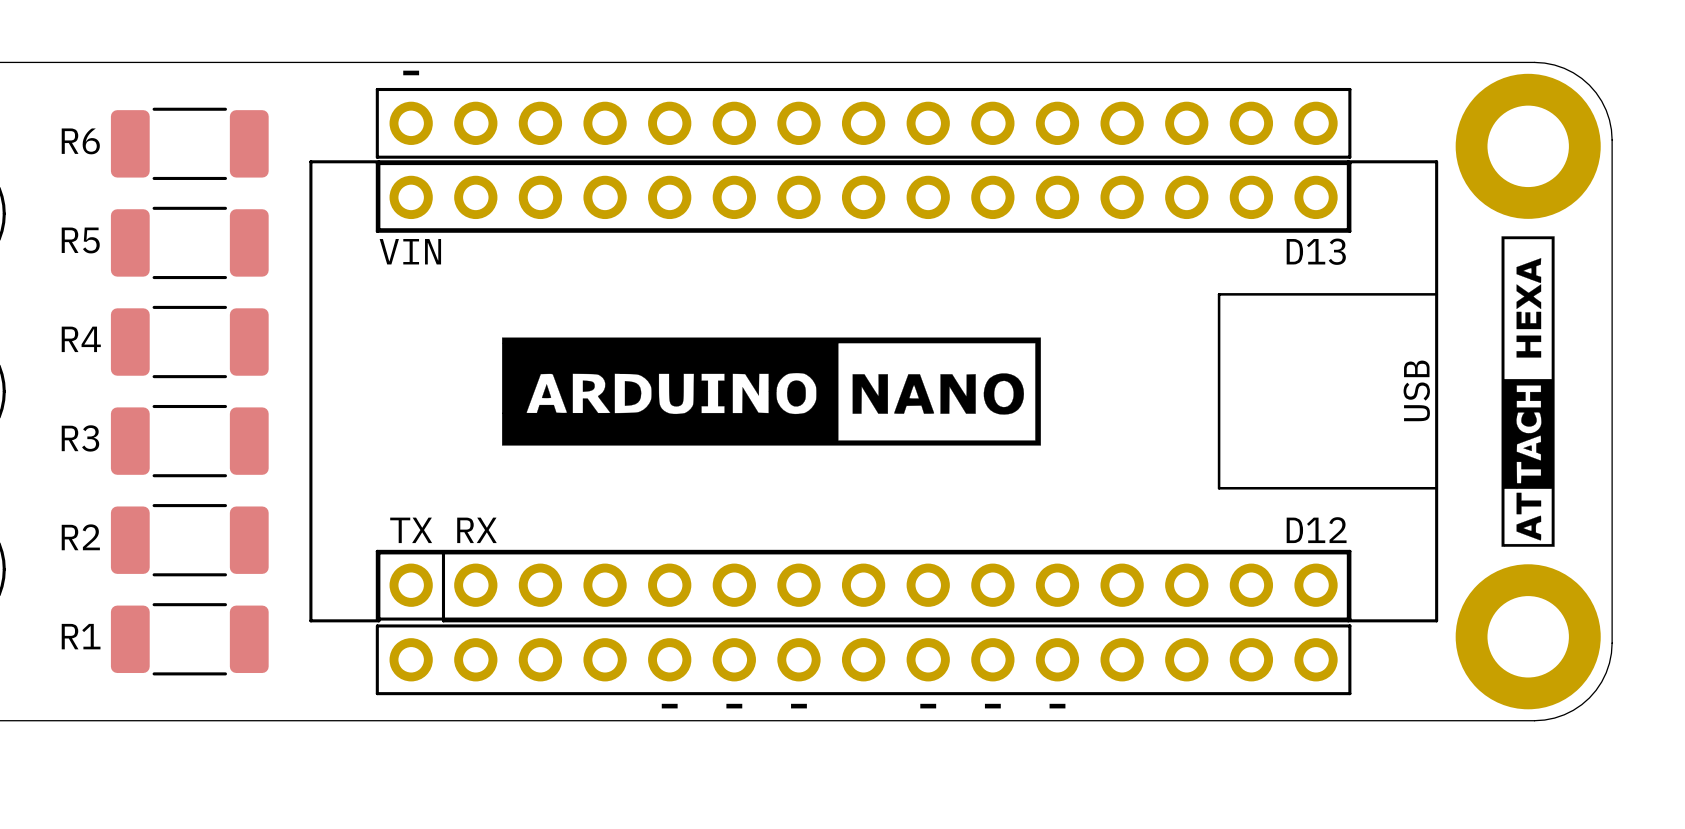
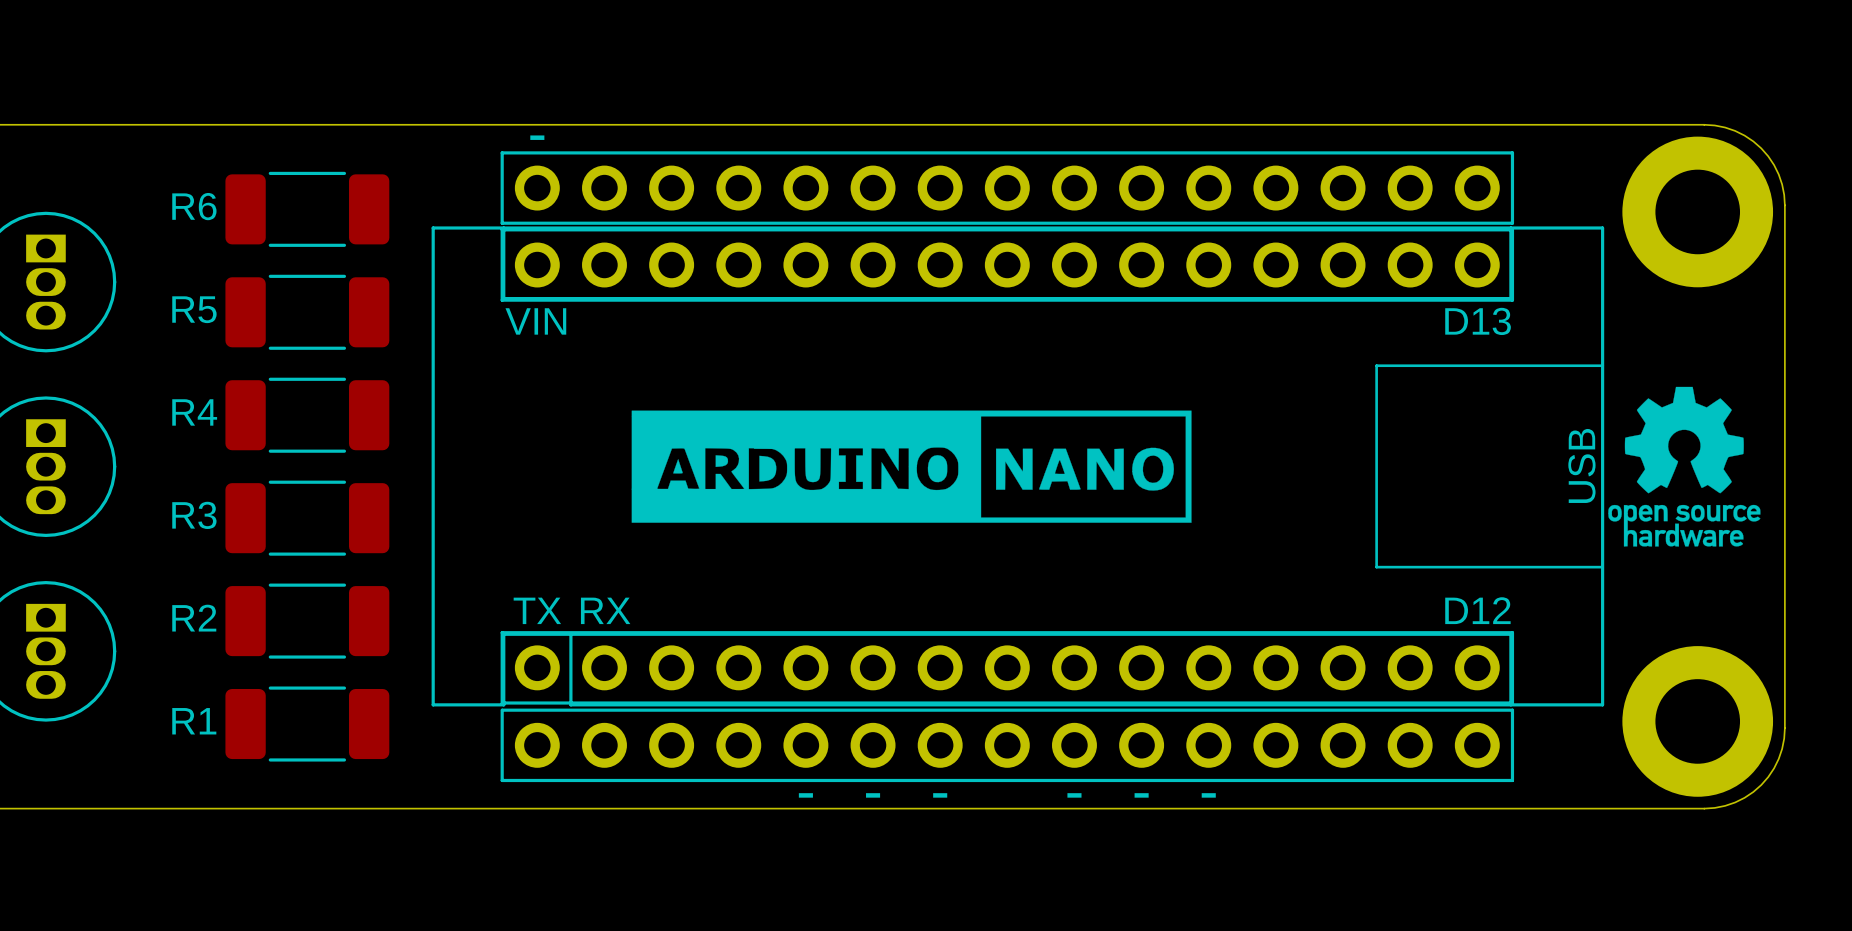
drawing shape: [1501, 236, 1555, 547] -> [1608, 386, 1761, 547]

